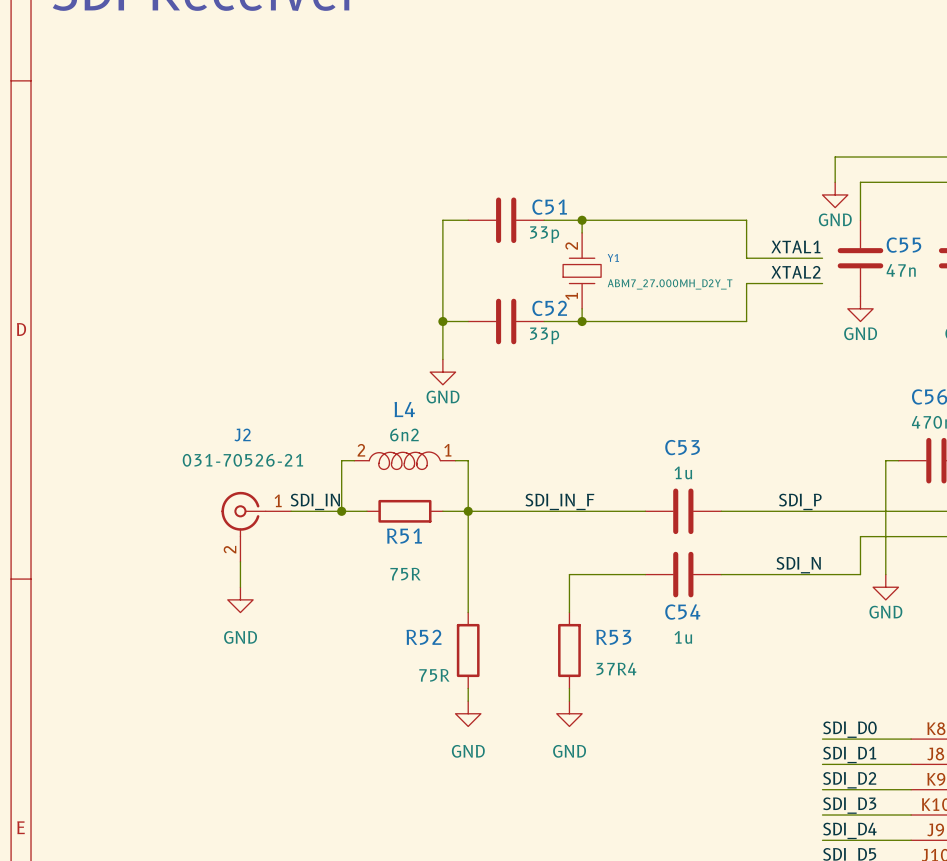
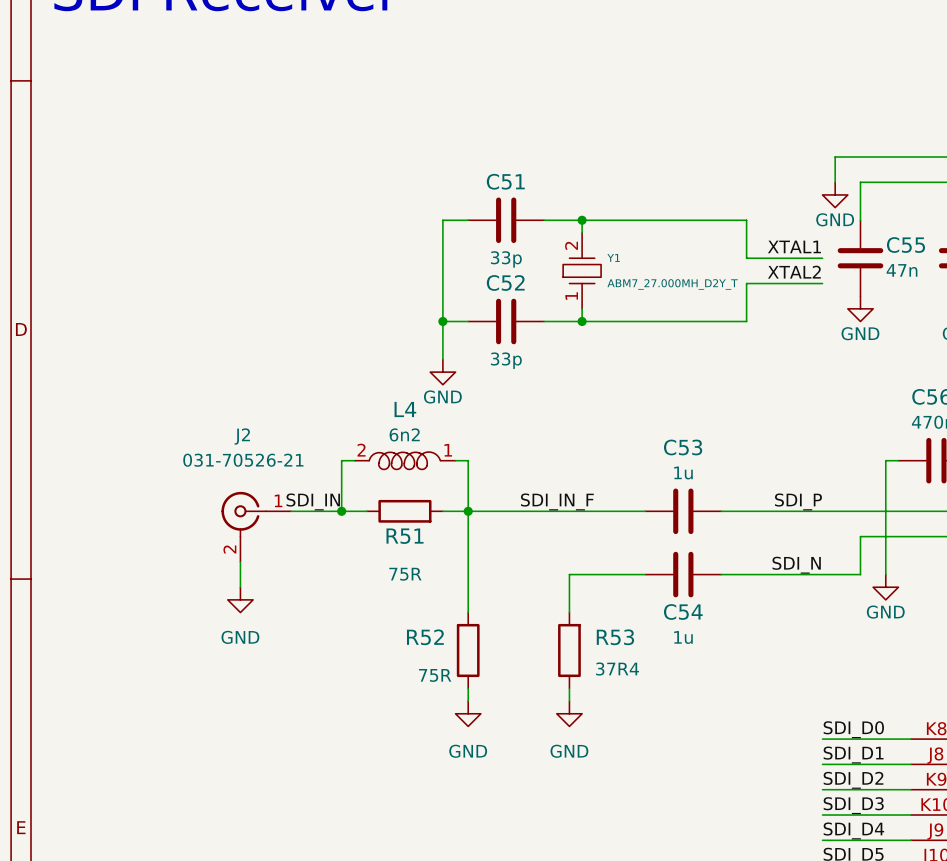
C51 name position: C51 (549, 207) -> C51 (505, 181)
C51 text position: 33p (544, 234) -> 33p (506, 259)
C52 name position: C52 (549, 308) -> C52 (505, 282)
C52 text position: 33p (544, 335) -> 33p (506, 360)

